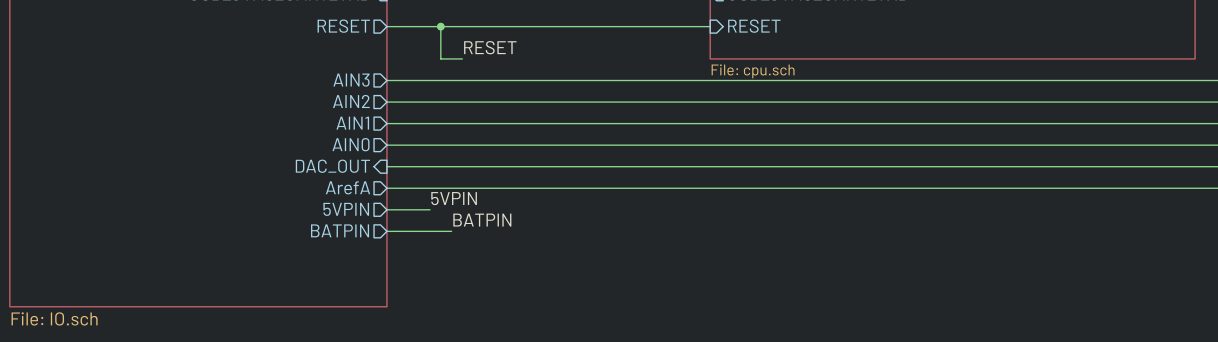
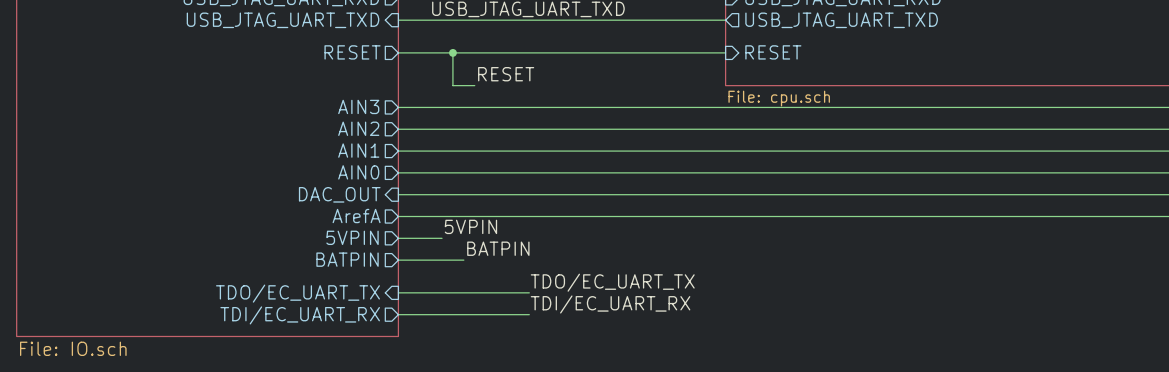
label: none -> TDO/EC_UART_TX (612, 282)
sheet pin: none -> TDO/EC_UART_TX (297, 293)
wire: none -> (398, 292) (529, 292)
label: none -> TDI/EC_UART_RX (610, 304)
sheet pin: none -> TDI/EC_UART_RX (300, 315)
wire: none -> (398, 314) (529, 314)

